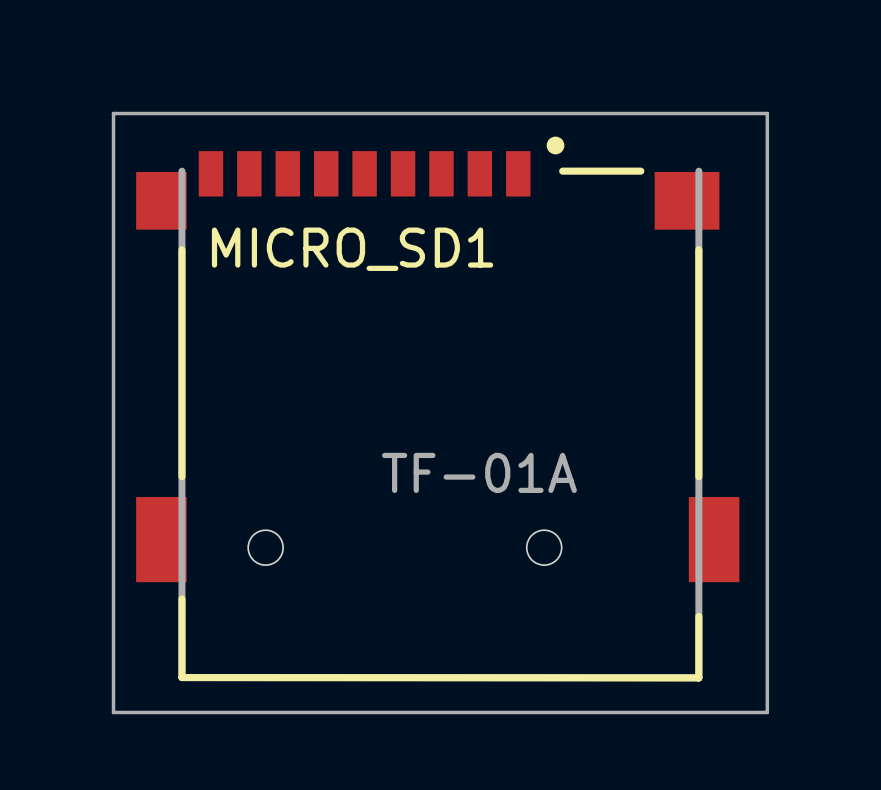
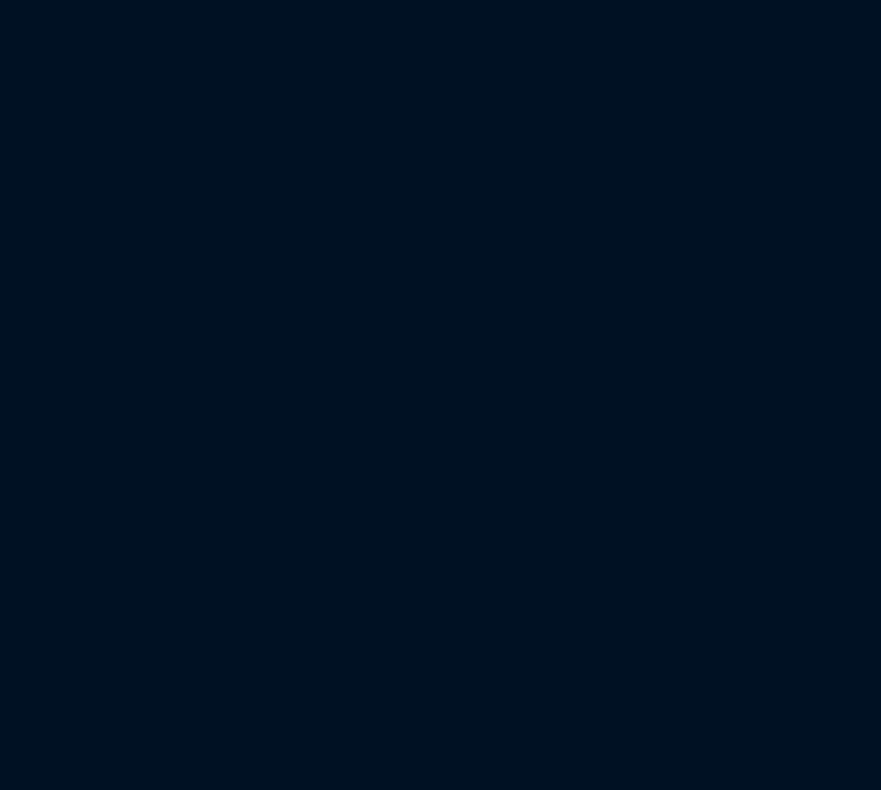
MICRO_SD1: TF-01A (440, 413) -> none

